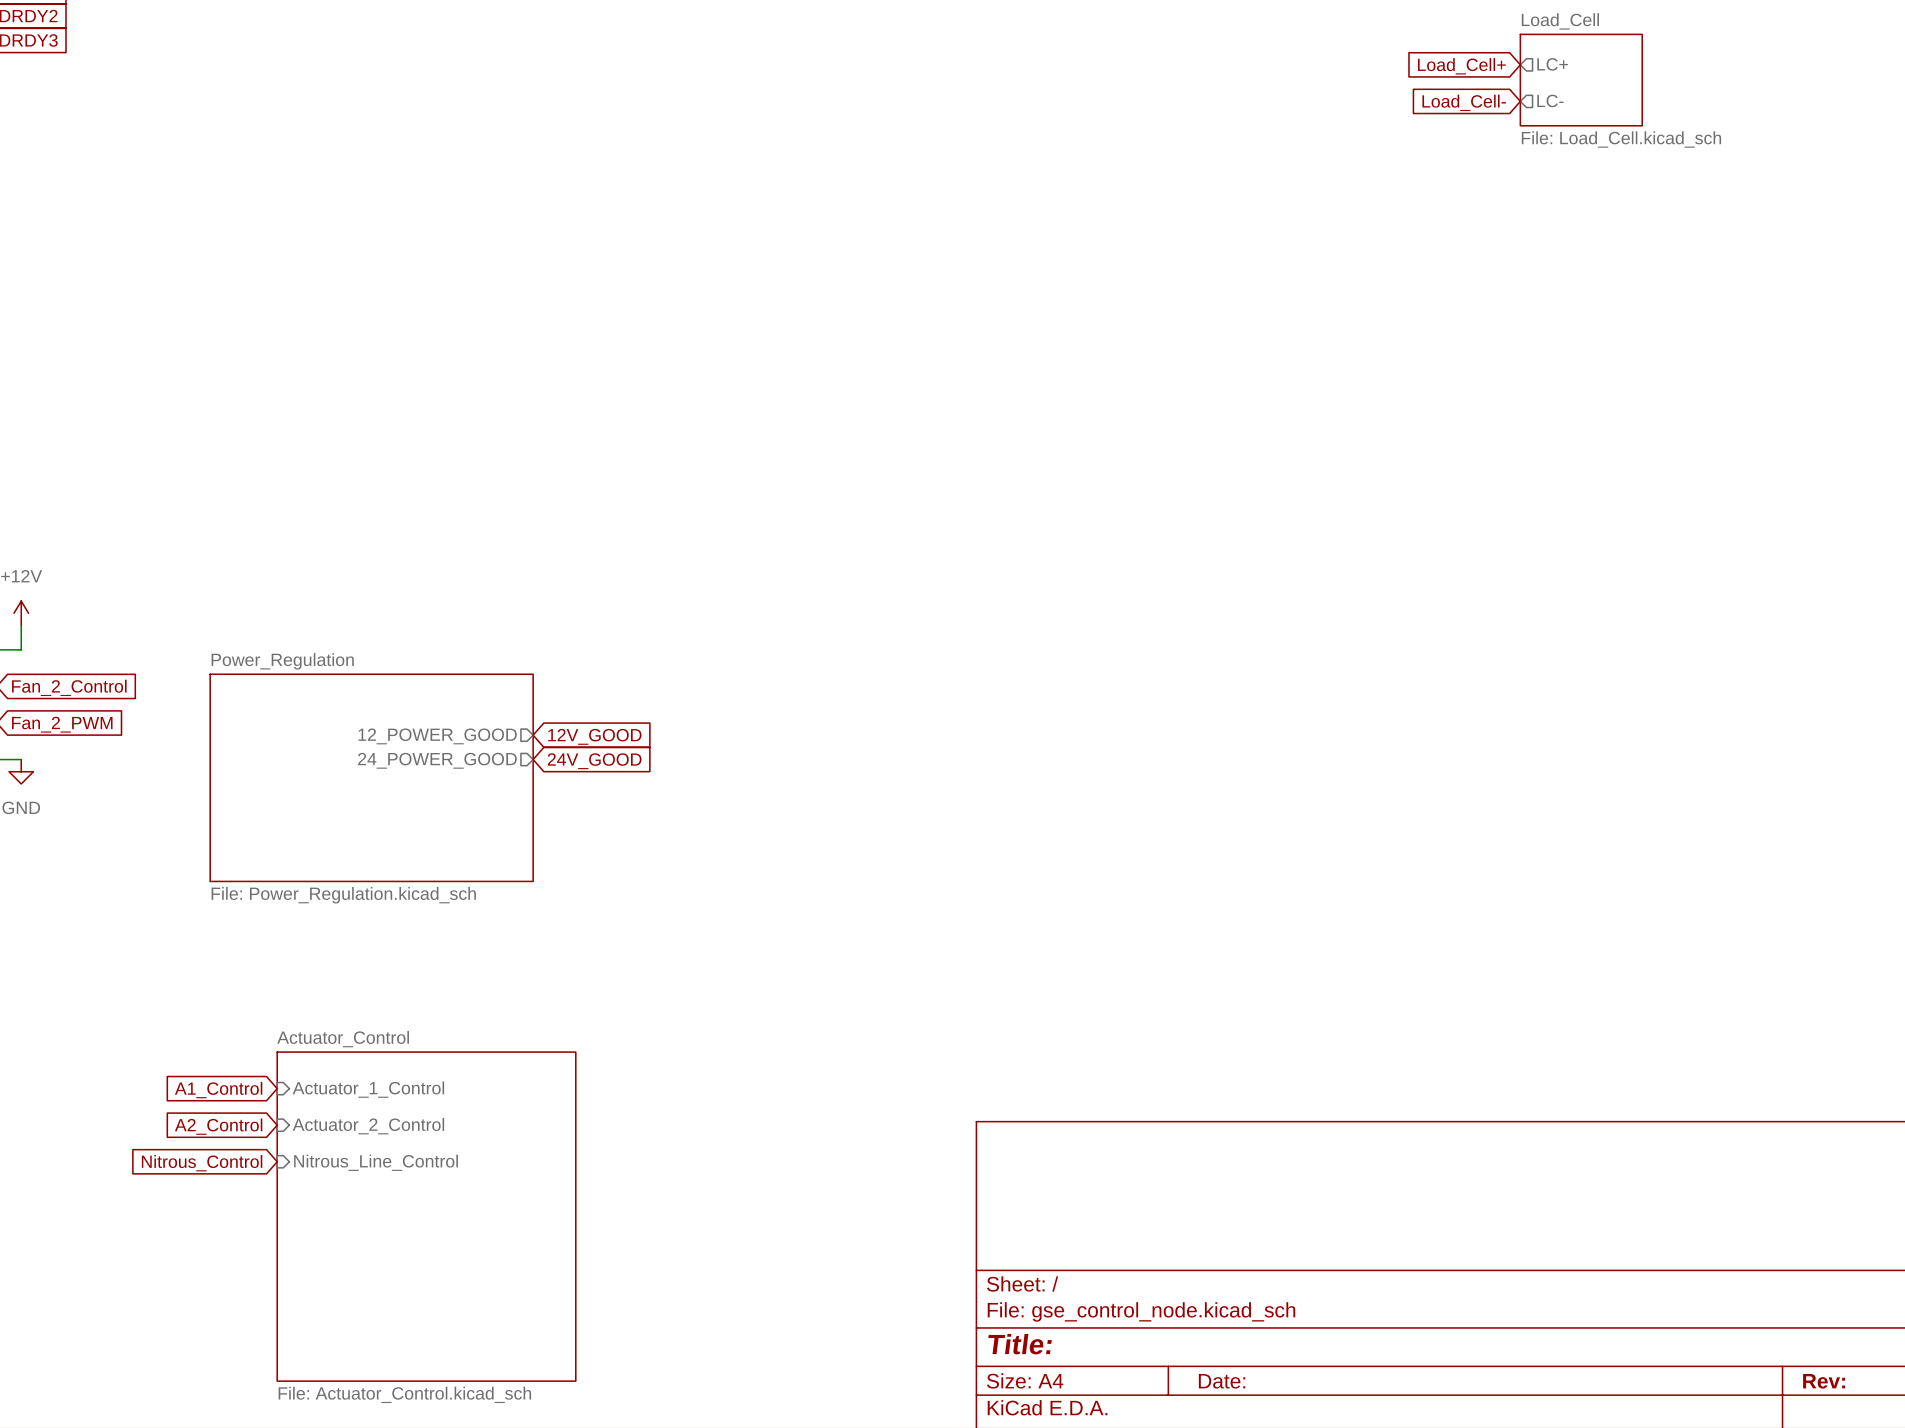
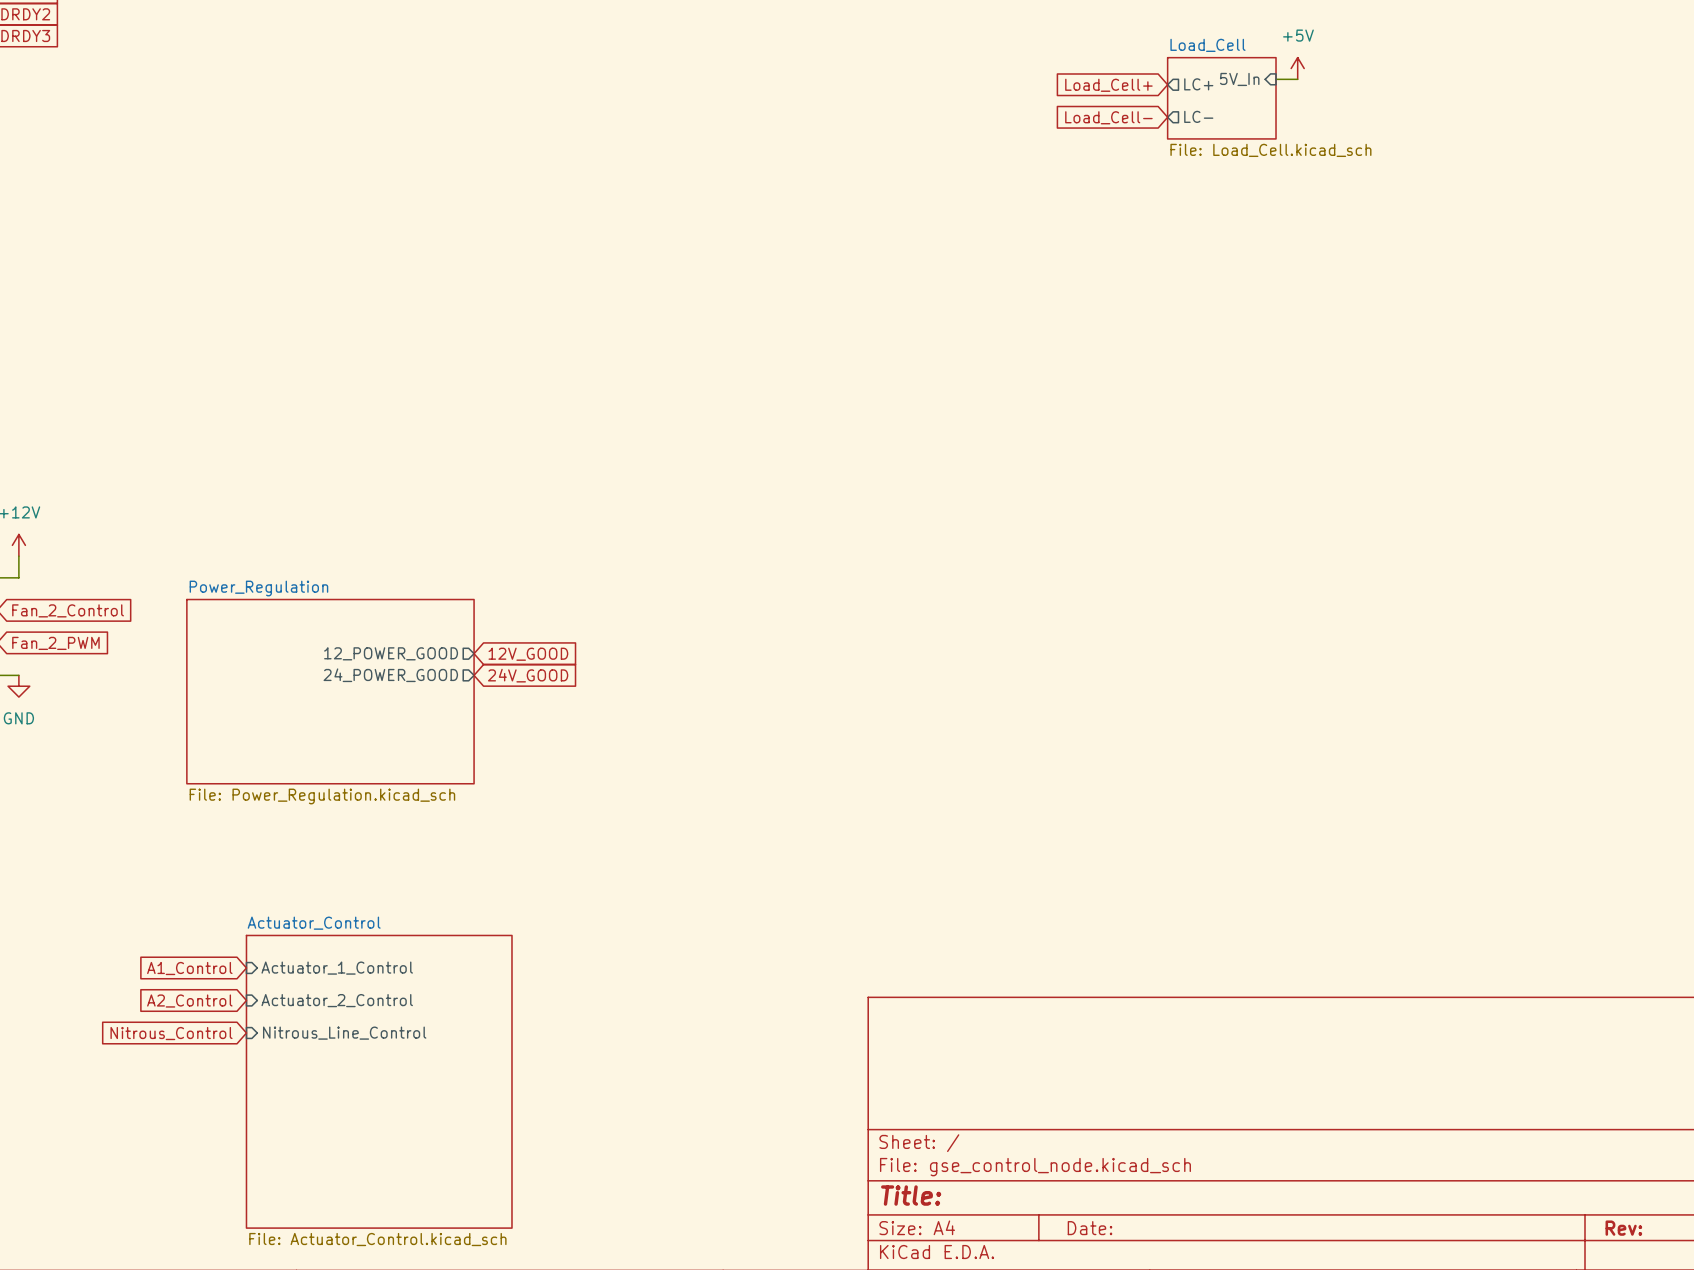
sheet pin position: LC+ (1552, 64) -> LC+ (1198, 84)
global label position: Load_Cell+ (1461, 66) -> Load_Cell+ (1108, 85)
power symbol: none -> +5V (1297, 68)
sheet Load_Cell position: (1581, 80) -> (1221, 98)
sheet pin: none -> 5V_In (1239, 79)
sheet pin position: LC- (1550, 100) -> LC- (1198, 116)
global label position: Load_Cell- (1464, 102) -> Load_Cell- (1108, 117)

